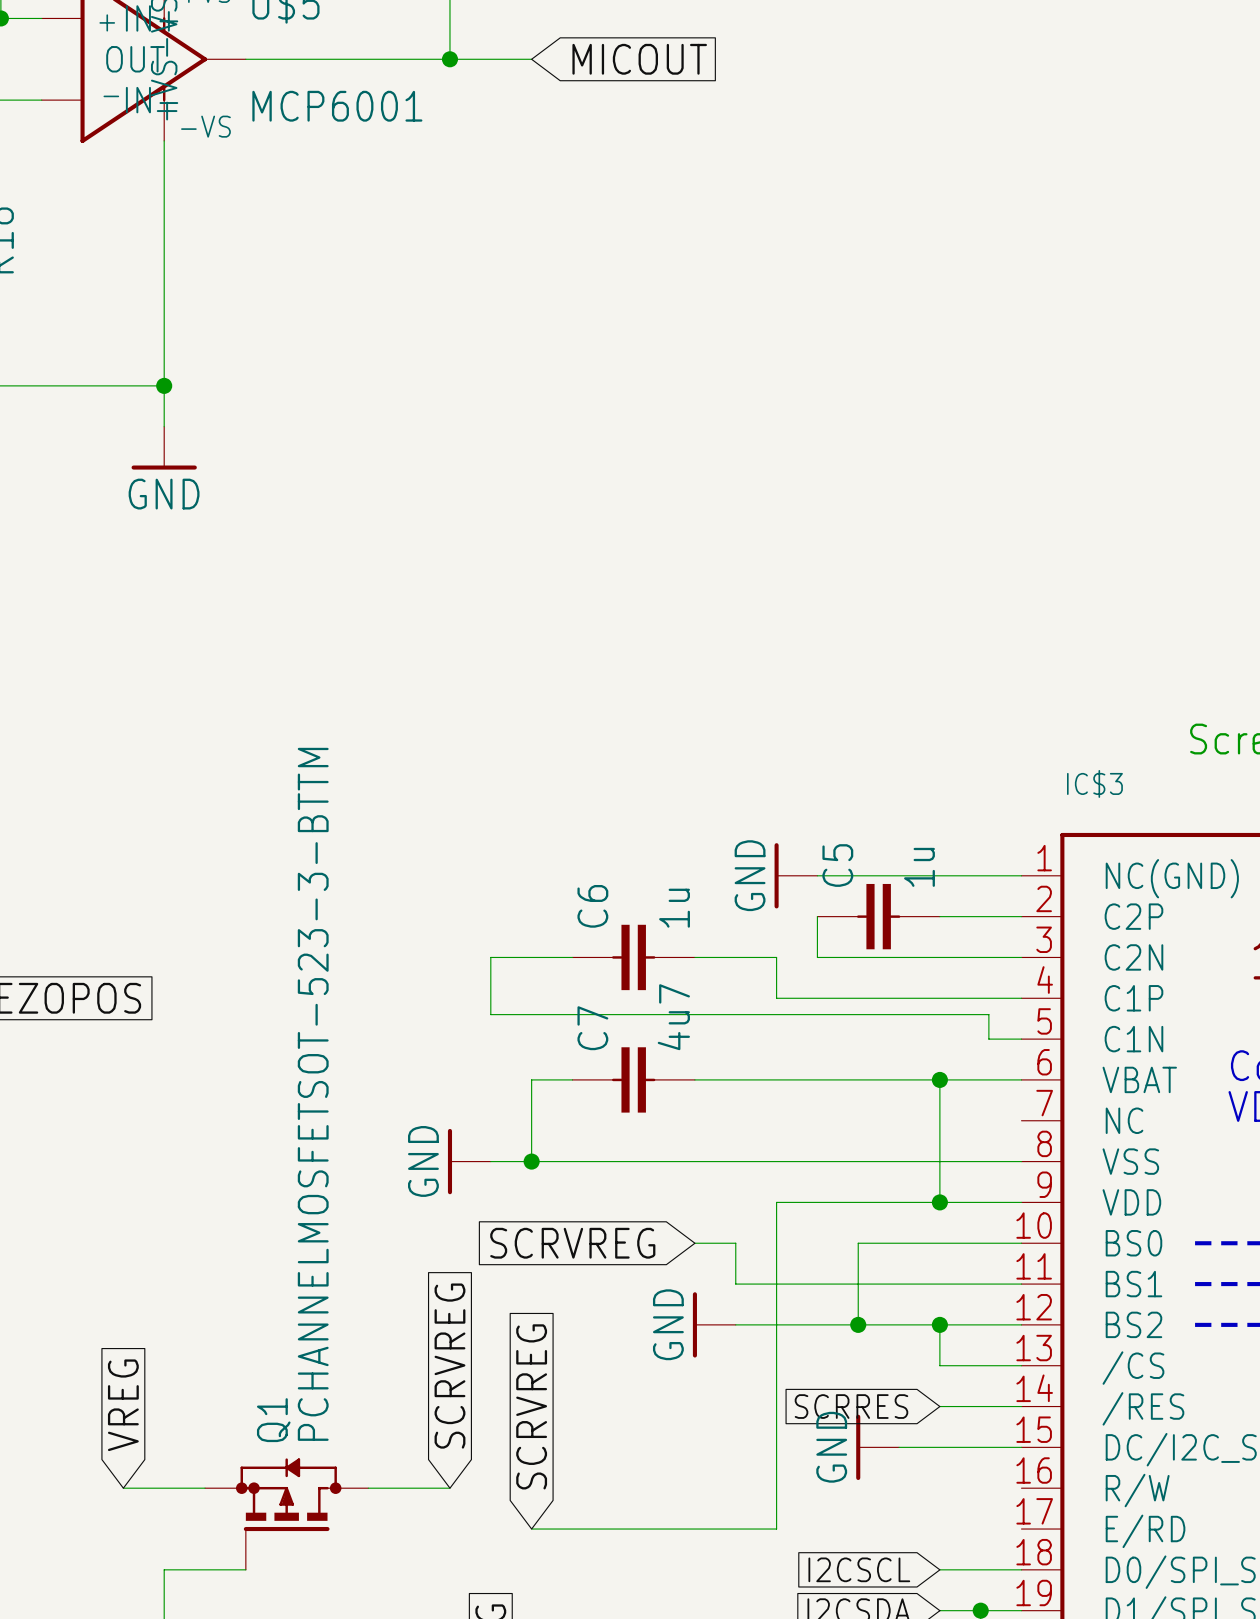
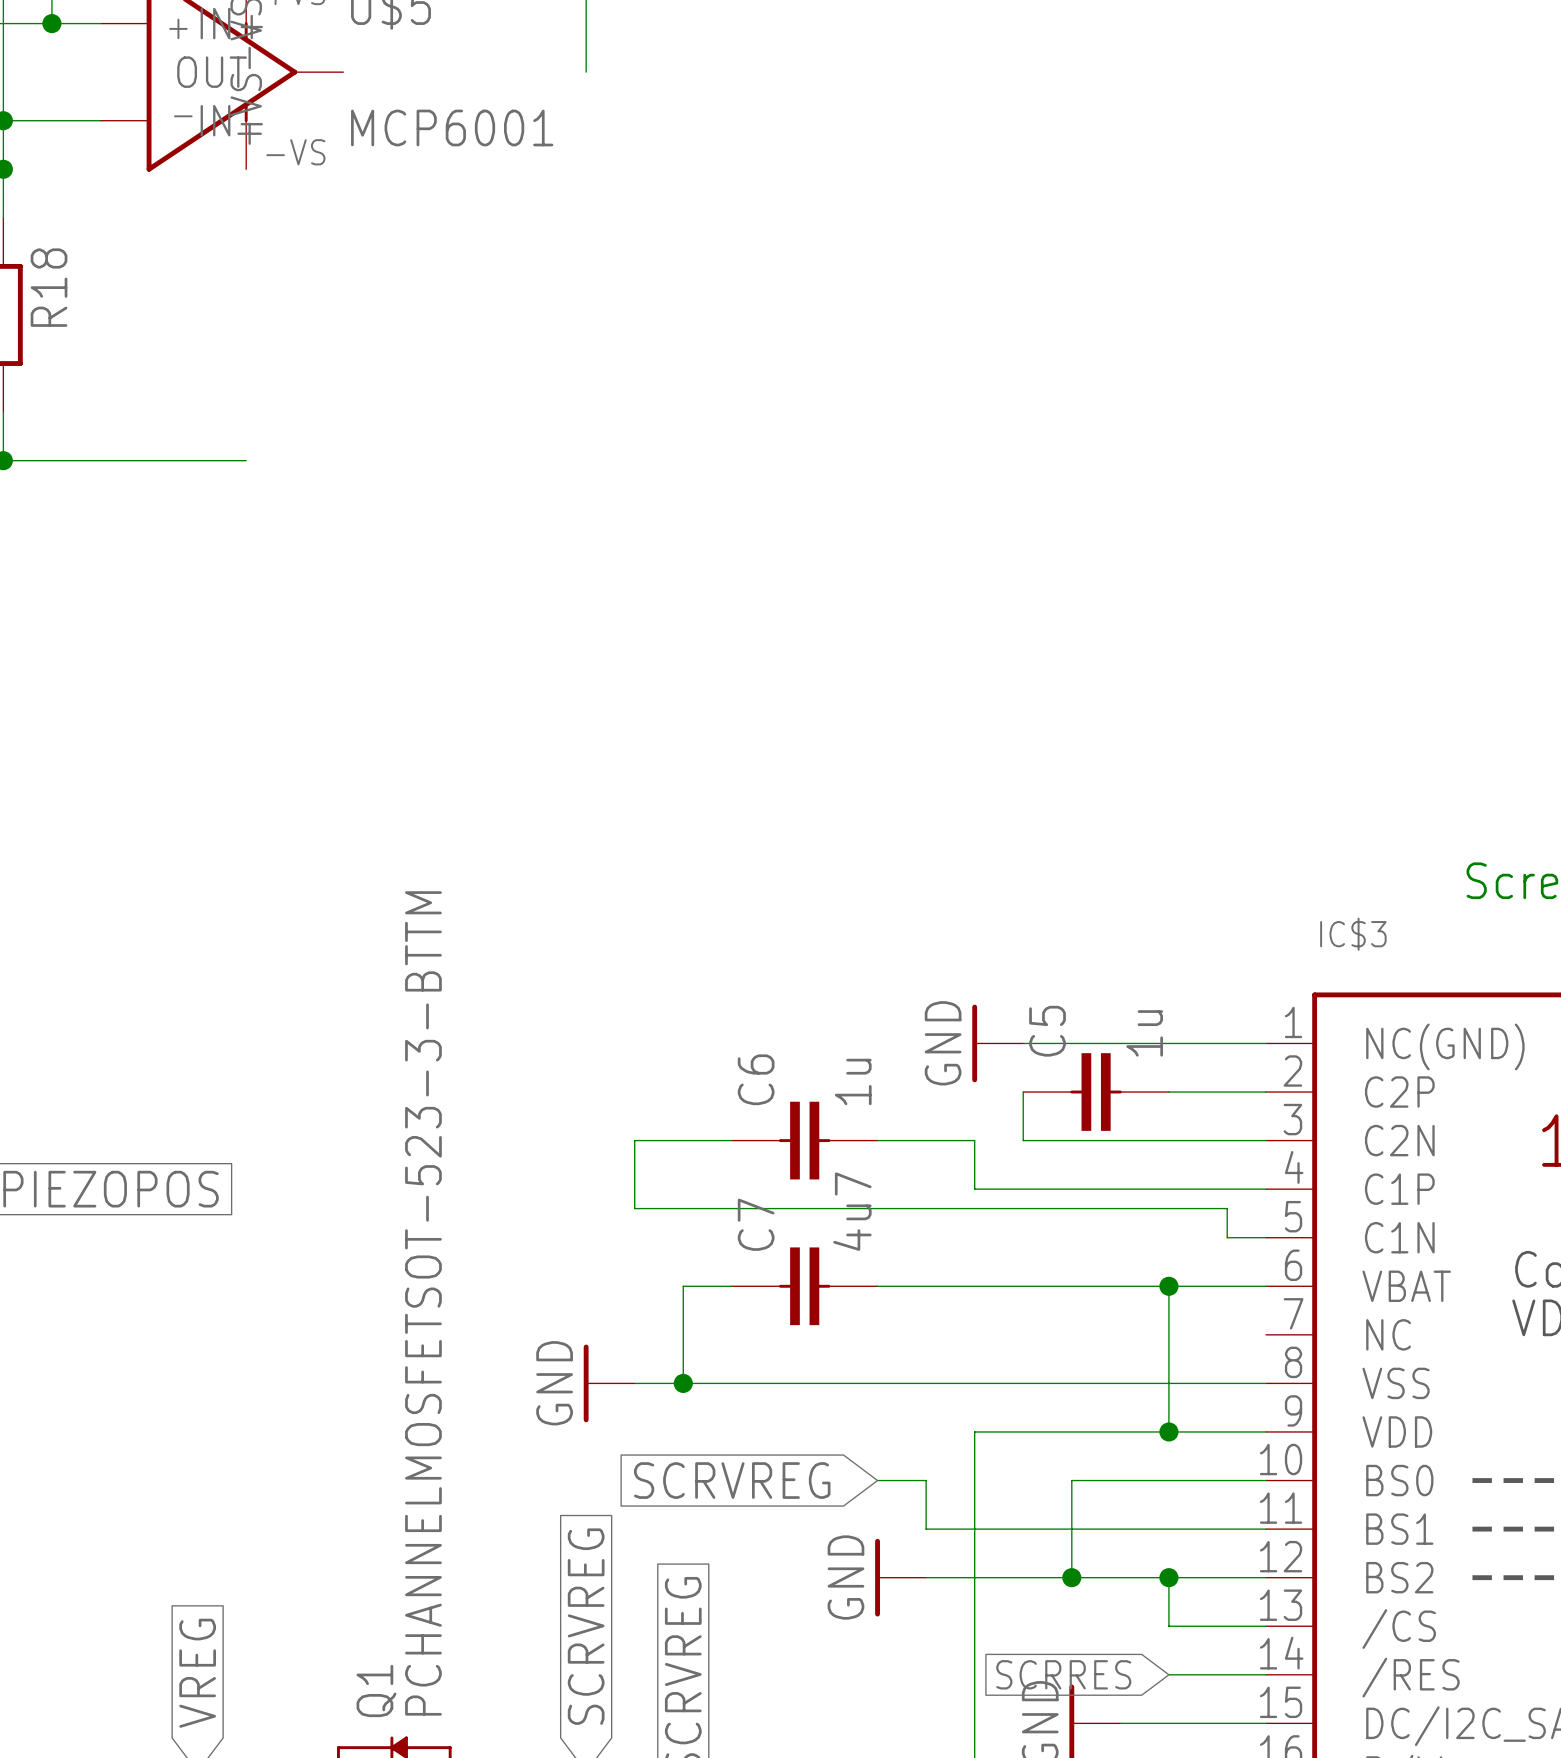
wire: (245, 59) (531, 59) -> none
junction: (449, 59) -> none
global label: MICOUT (639, 59) -> none
wire: (164, 140) (164, 426) -> none
junction: (164, 385) -> none
power symbol: GND (164, 448) -> none

